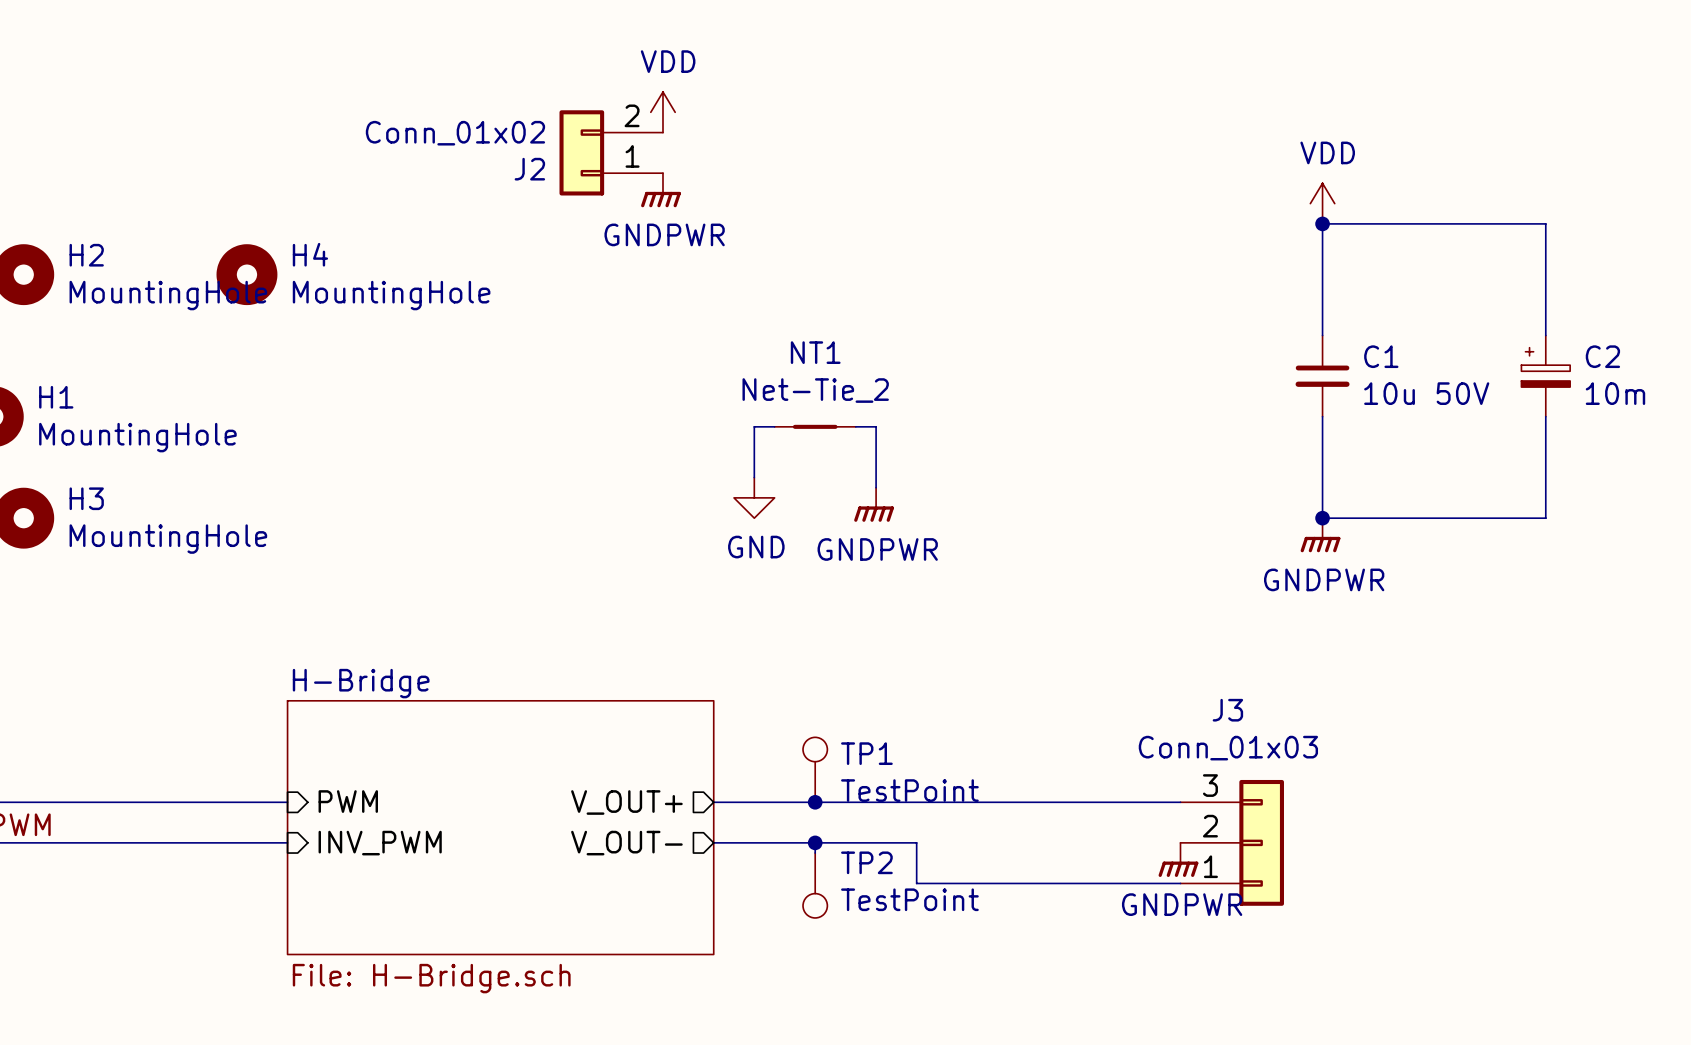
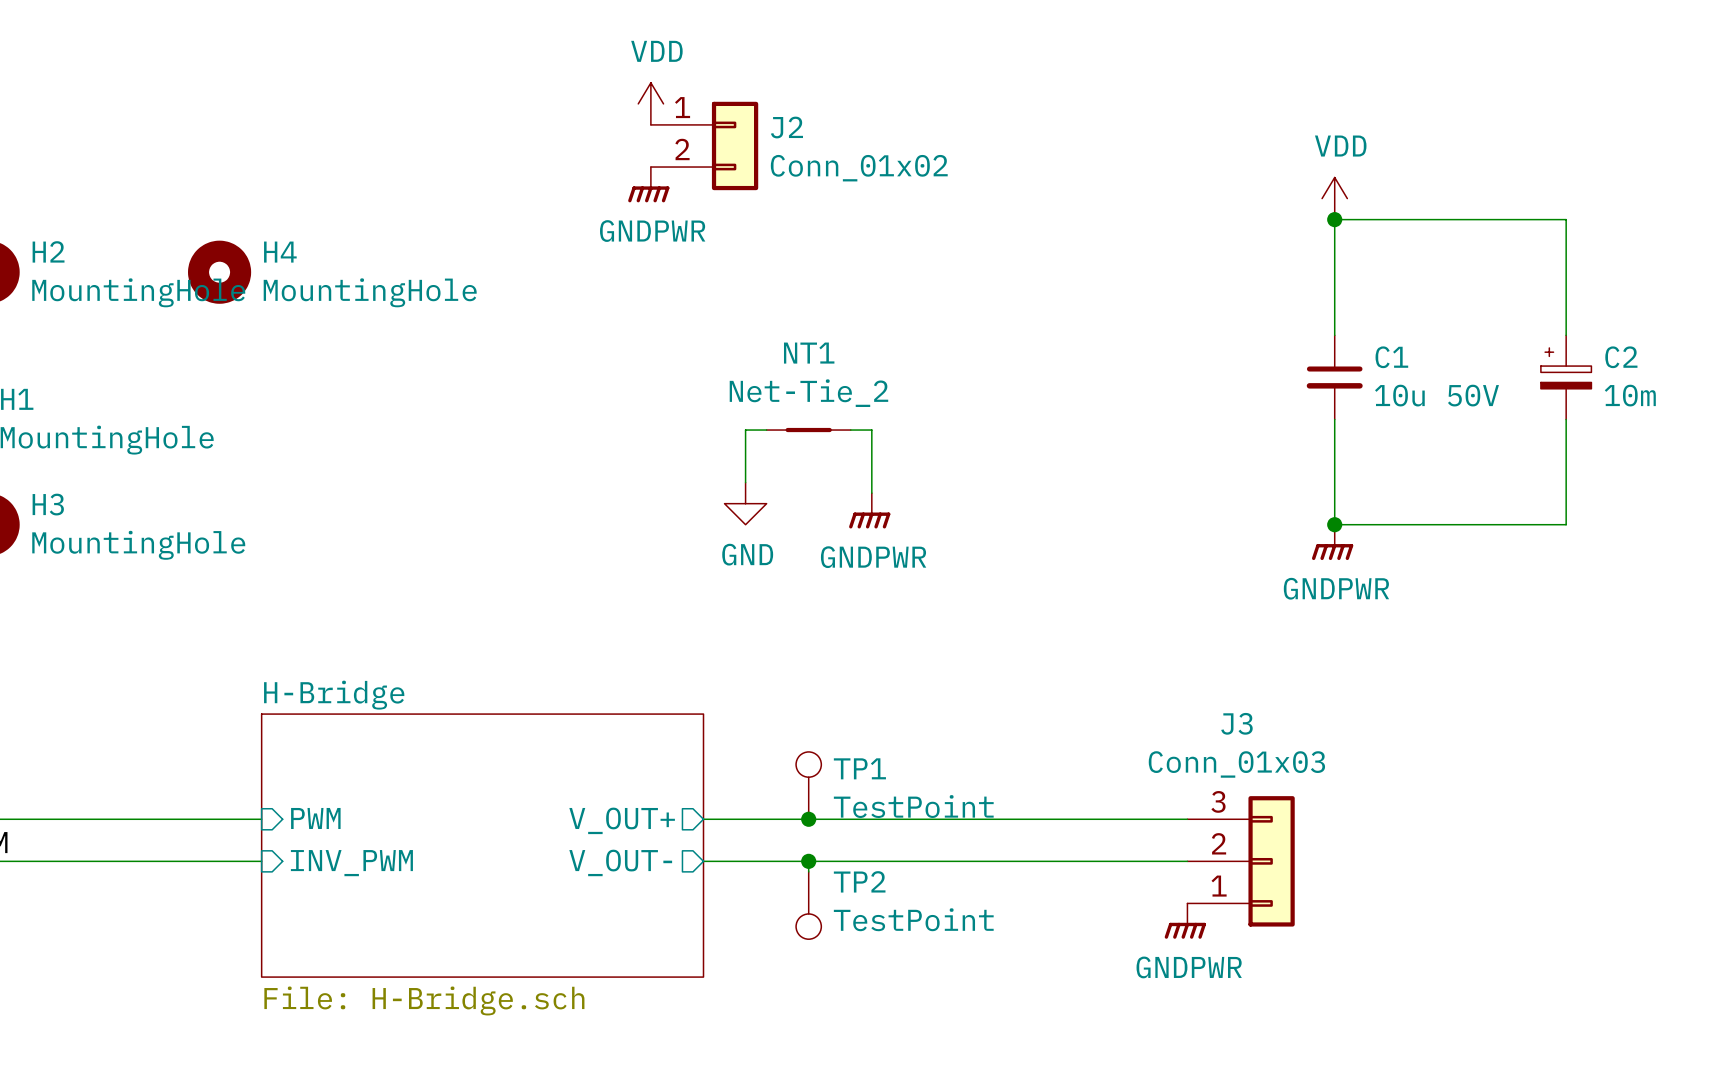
J2 rotation: 0° (581, 152) -> 180° (735, 145)
J2 position: (611, 152) -> (704, 145)
wire: (916, 842) (916, 883) (1180, 883) -> (913, 861) (1187, 861)
power symbol position: GNDPWR (1178, 859) -> GNDPWR (1185, 921)

